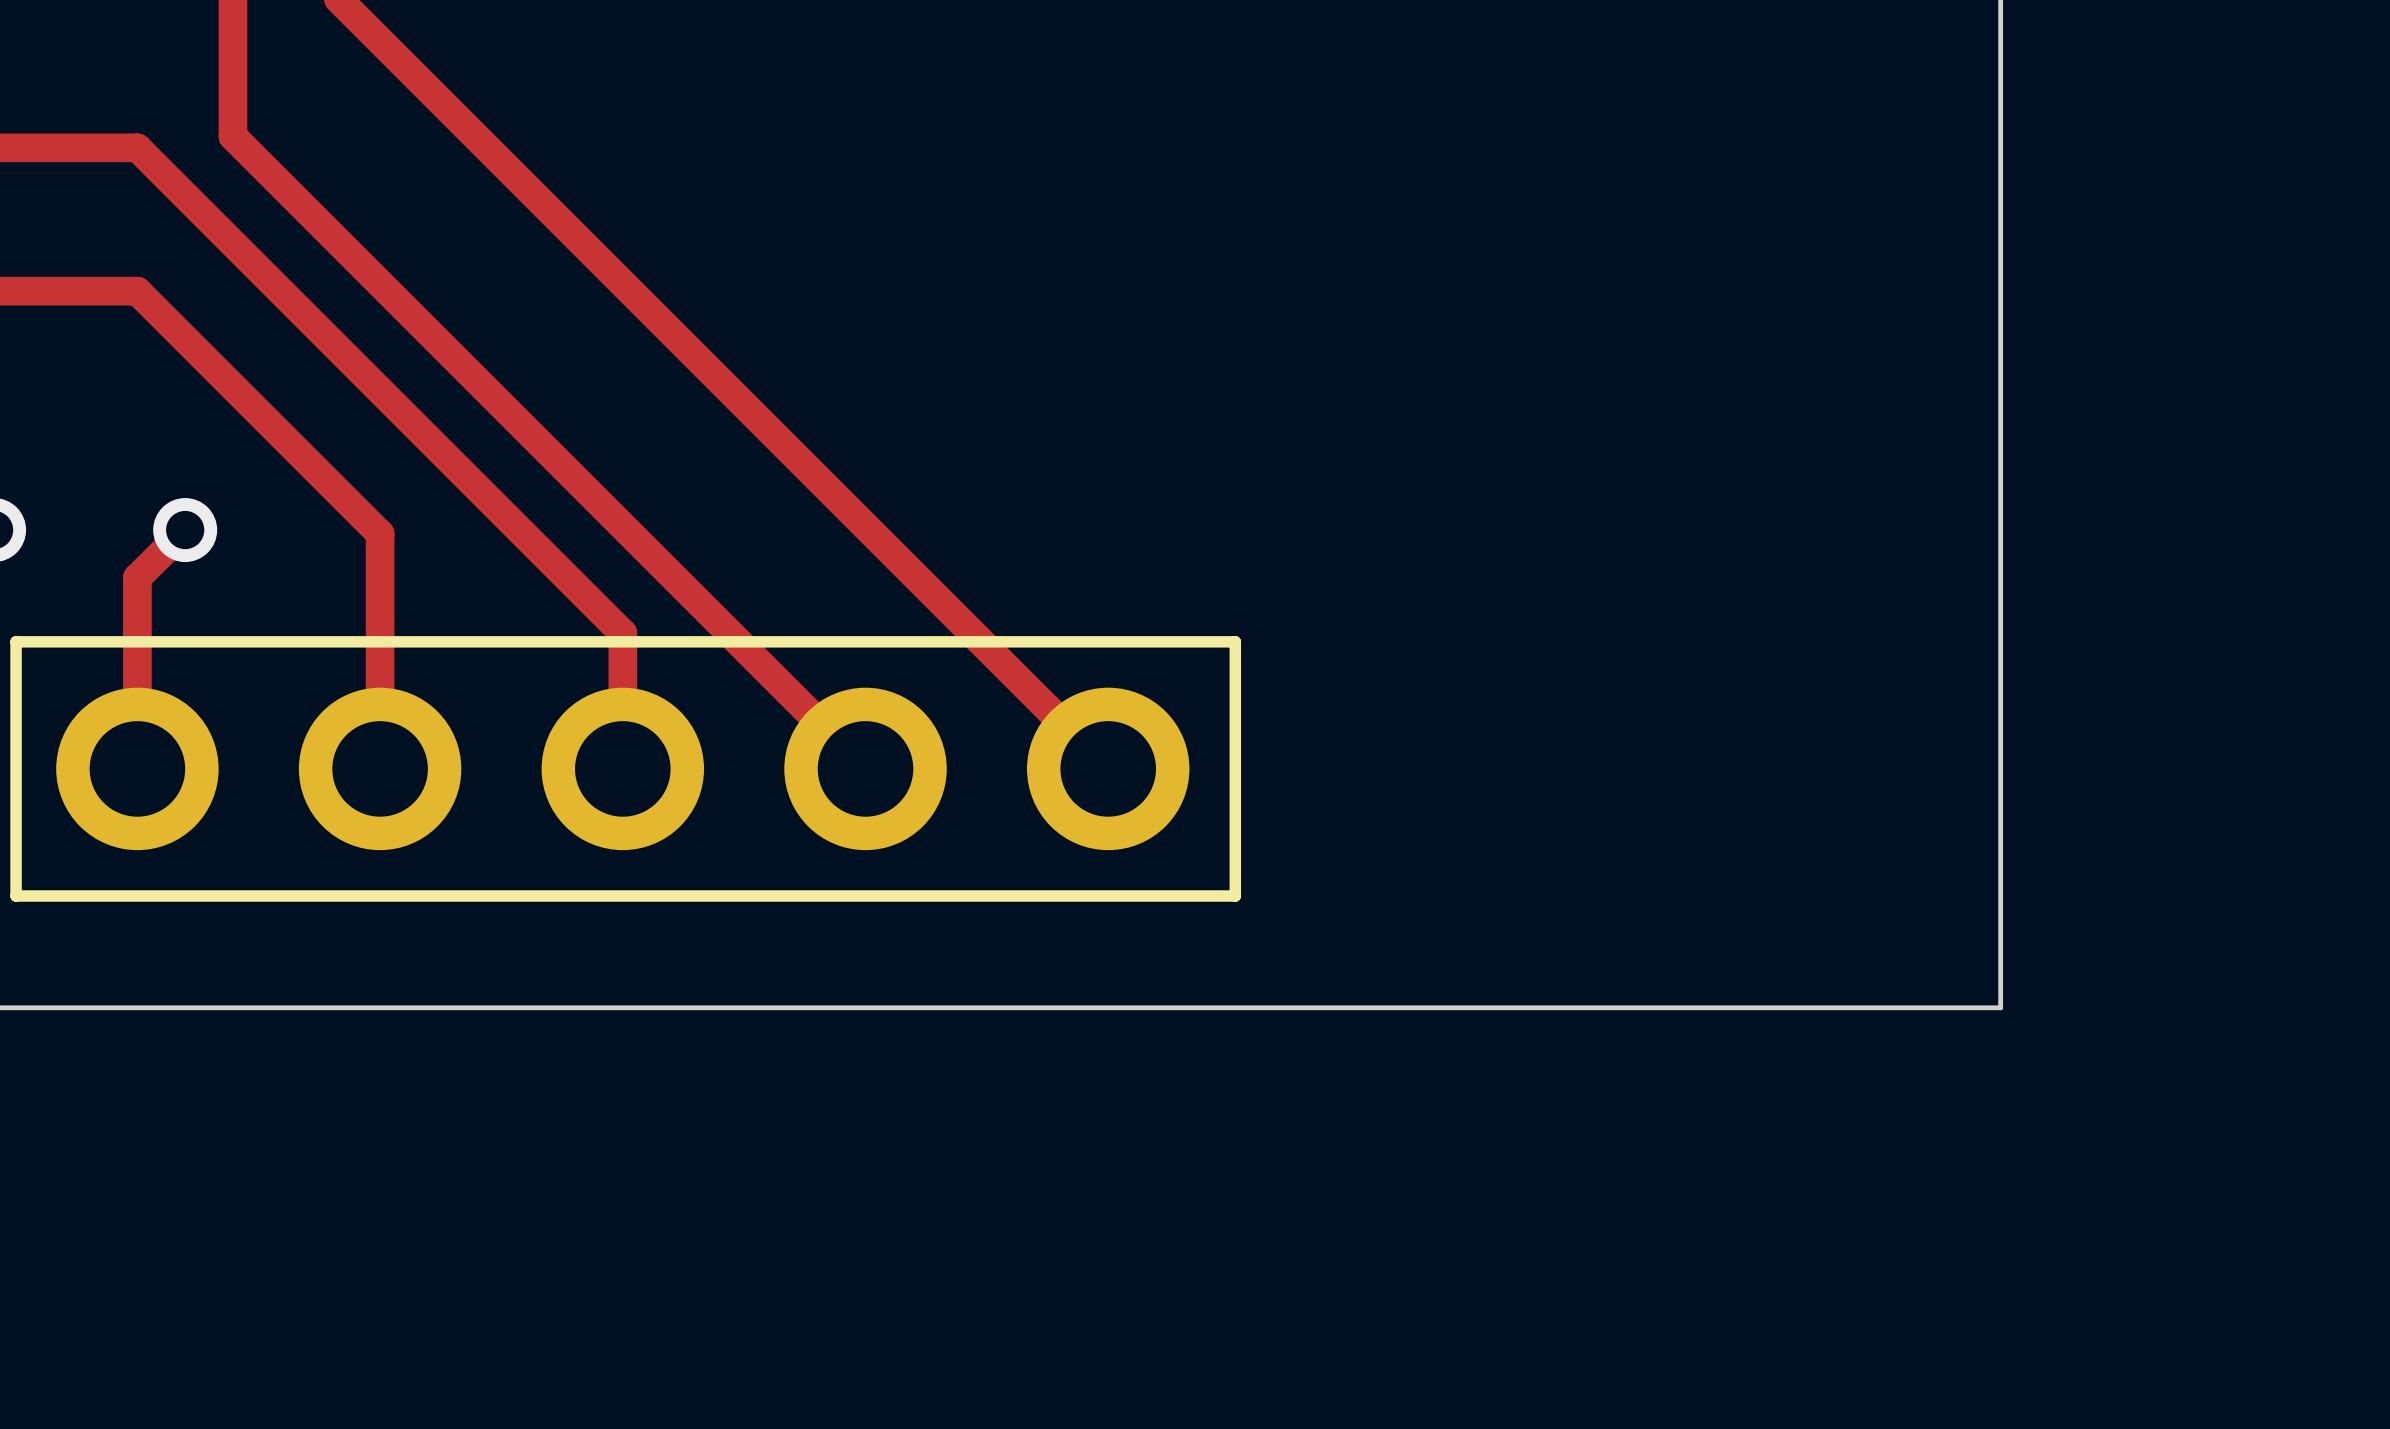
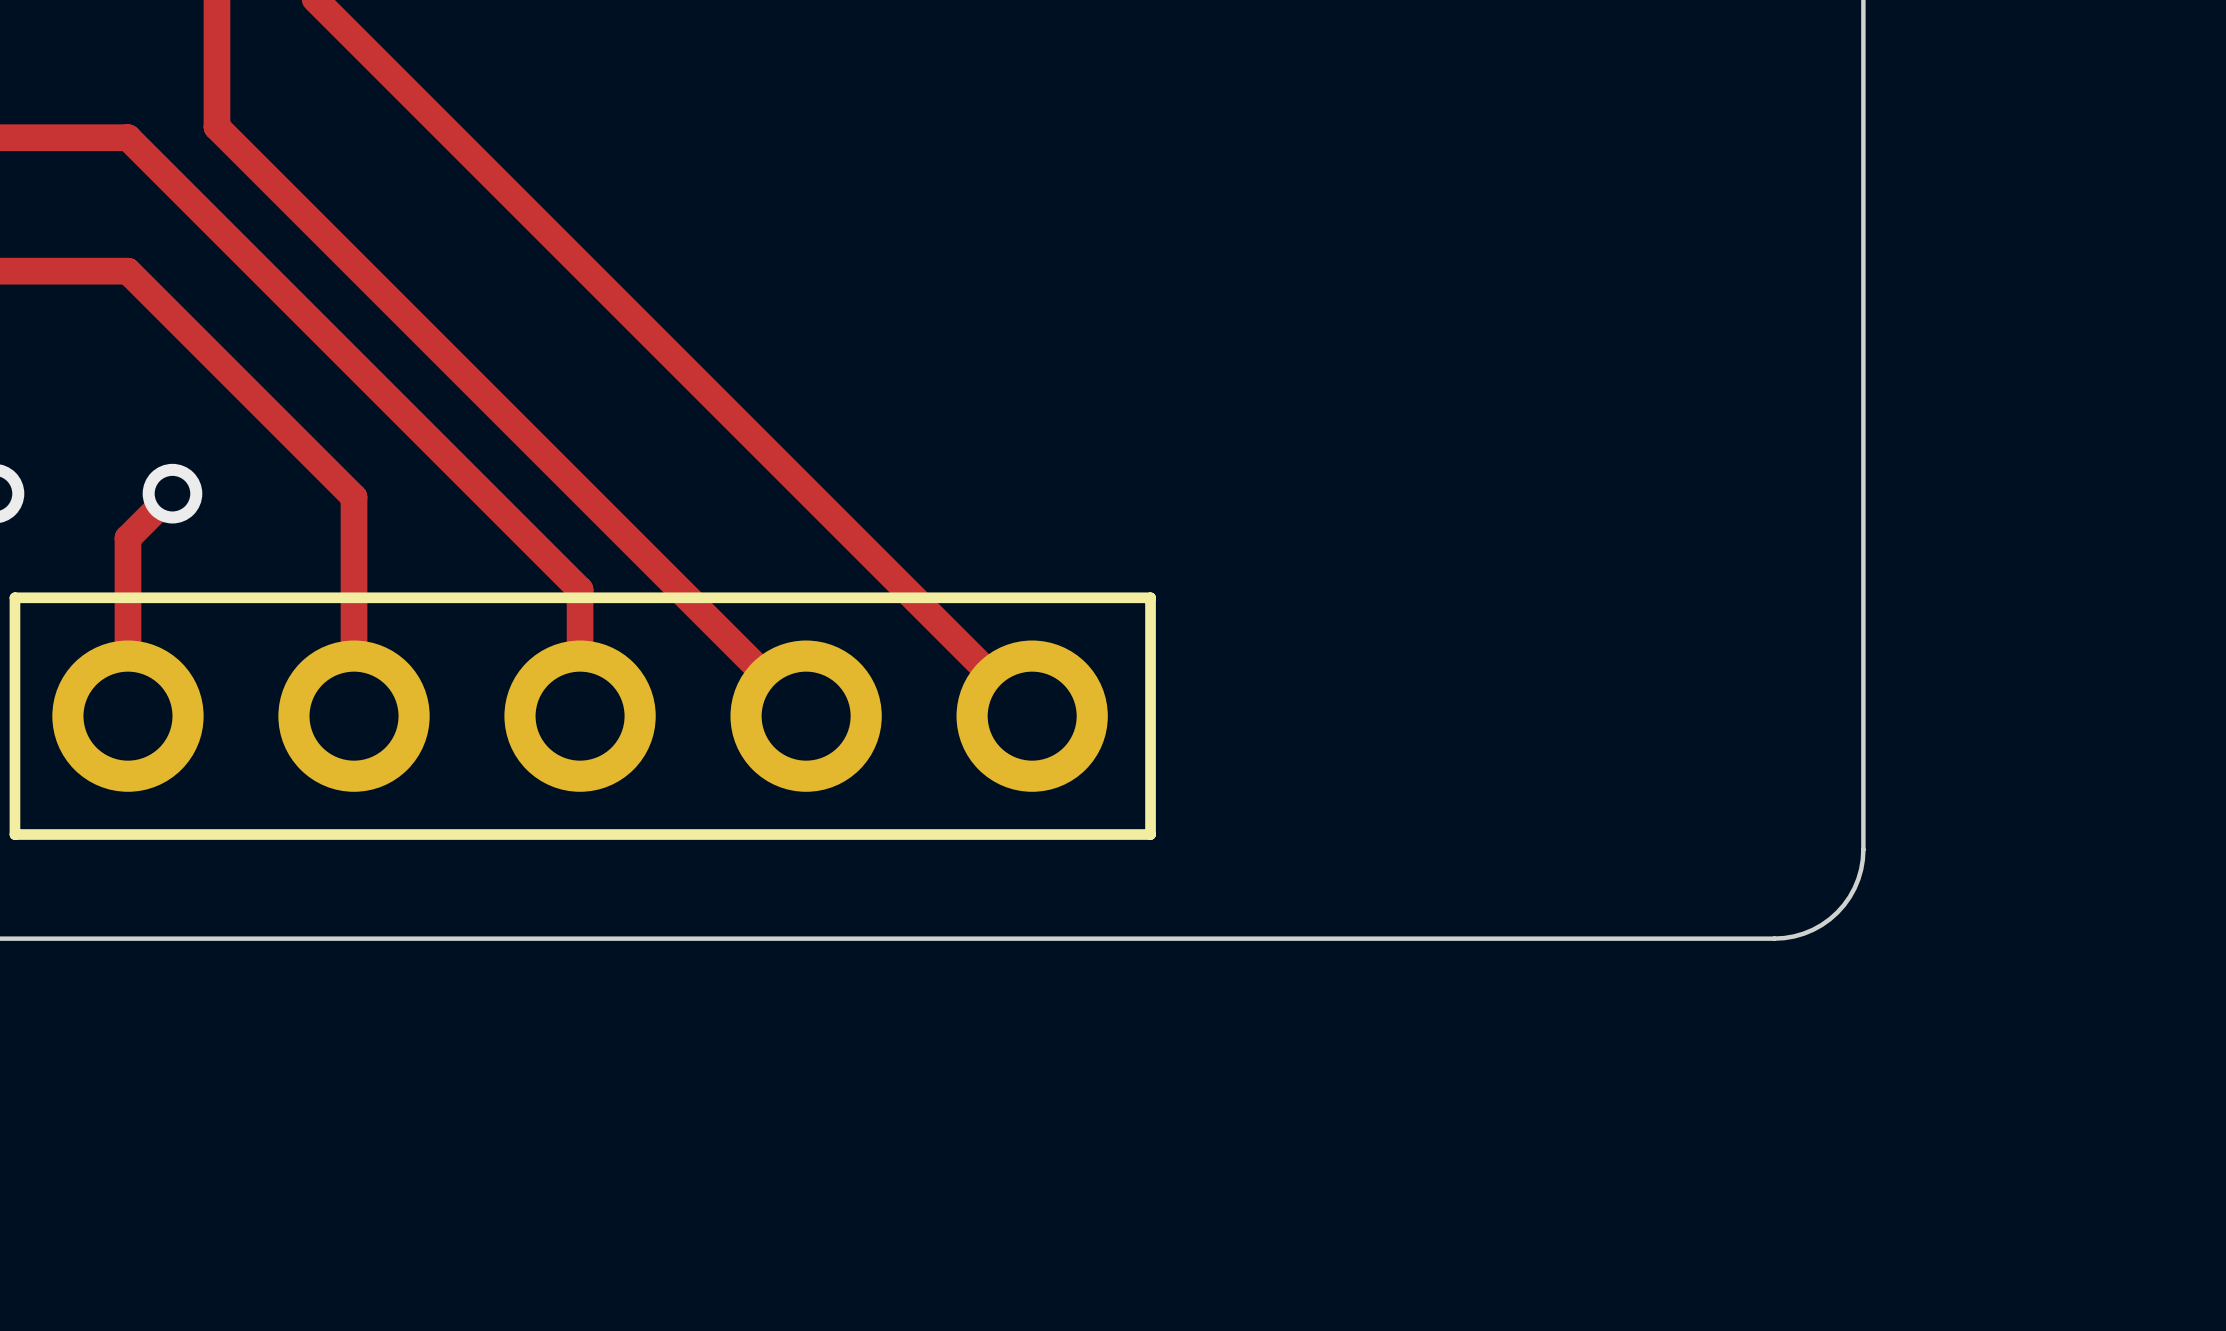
board edge: (2000, 912) (2000, 1007) (1905, 1007) -> (1863, 849) (1858, 879) (1849, 897) (1837, 912) (1821, 925) (1803, 933) (1774, 938)

